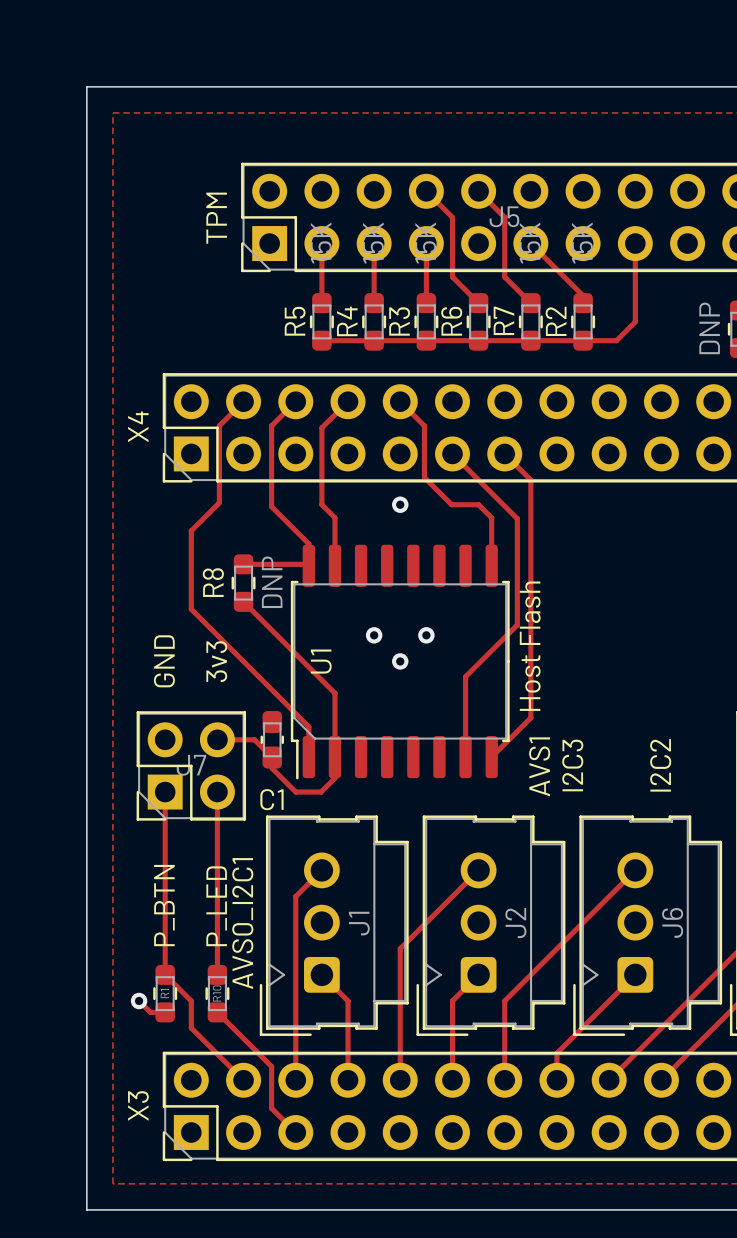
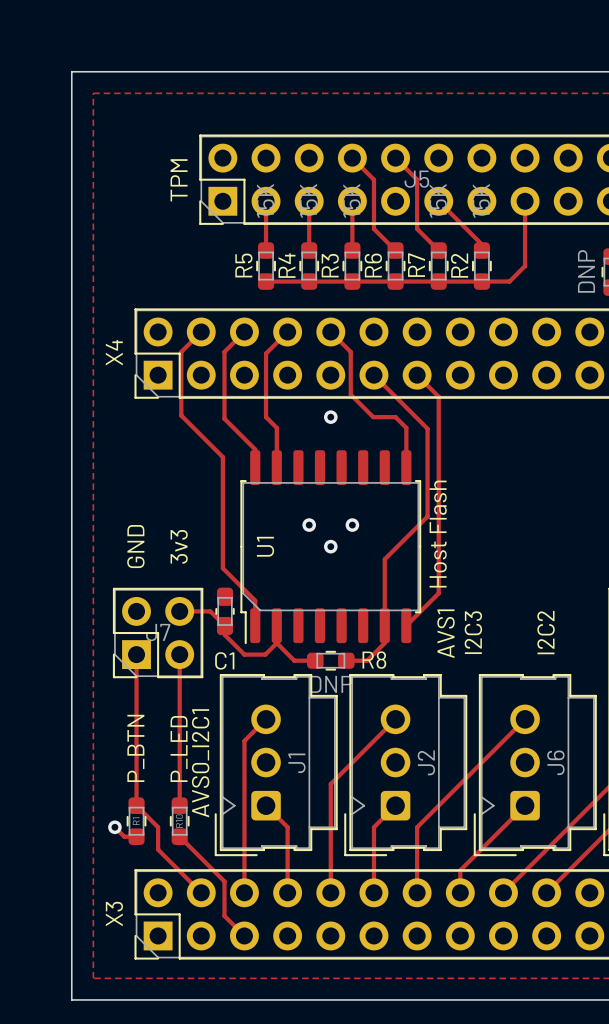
track: (219, 502) (191, 530) (191, 609) (269, 687) -> (181, 415) (222, 457) (222, 568)
track: (243, 564) (307, 564) -> none
R8 name position: R8 (213, 582) -> R8 (374, 660)
R8 rotation: 0° (243, 583) -> 90° clockwise (330, 660)
R8 position: (243, 583) -> (330, 660)
track: (243, 601) (334, 693) (334, 757) -> none
track: none -> (384, 625) (384, 643) (367, 660) (346, 660)
track: none -> (276, 643) (294, 660) (315, 660)

